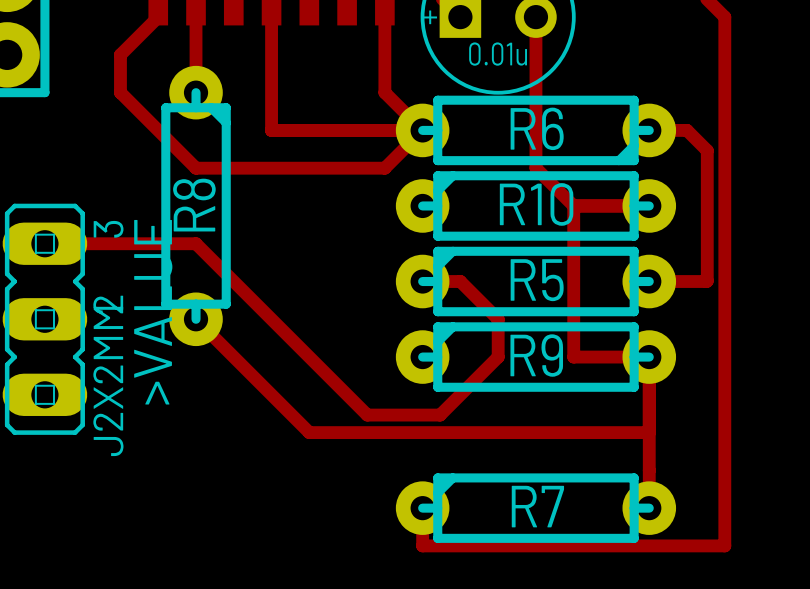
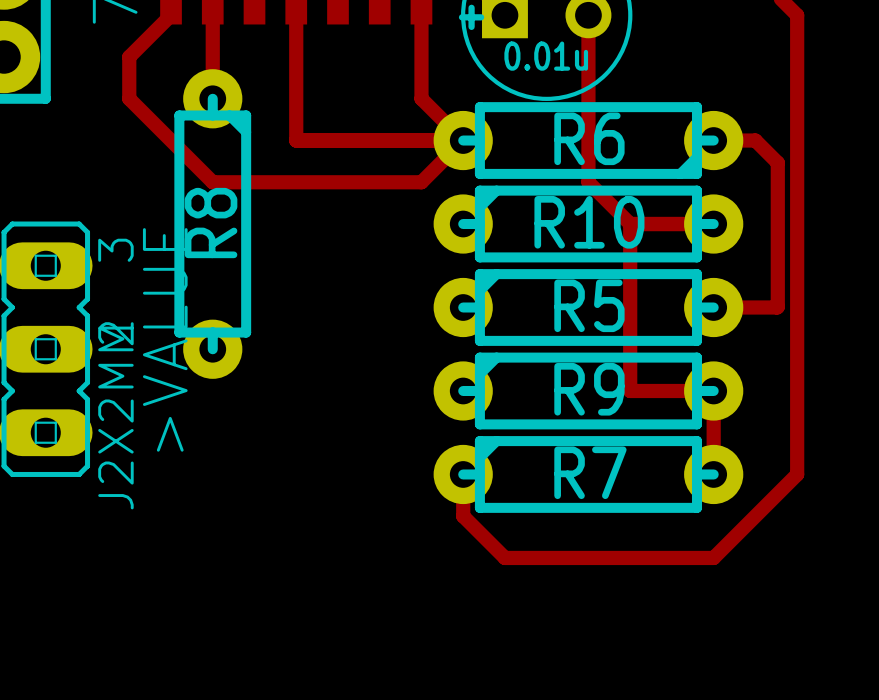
track: (44, 243) (196, 243) (367, 415) (440, 415) (498, 357) (498, 319) (460, 281) (422, 281) -> none
track: (196, 319) (309, 432) (649, 432) (649, 508) -> none
track: (724, 432) (724, 545) (422, 545) (422, 508) -> (797, 474) (713, 557) (504, 557) (463, 516) (463, 474)
R7 position: (535, 508) -> (588, 474)

